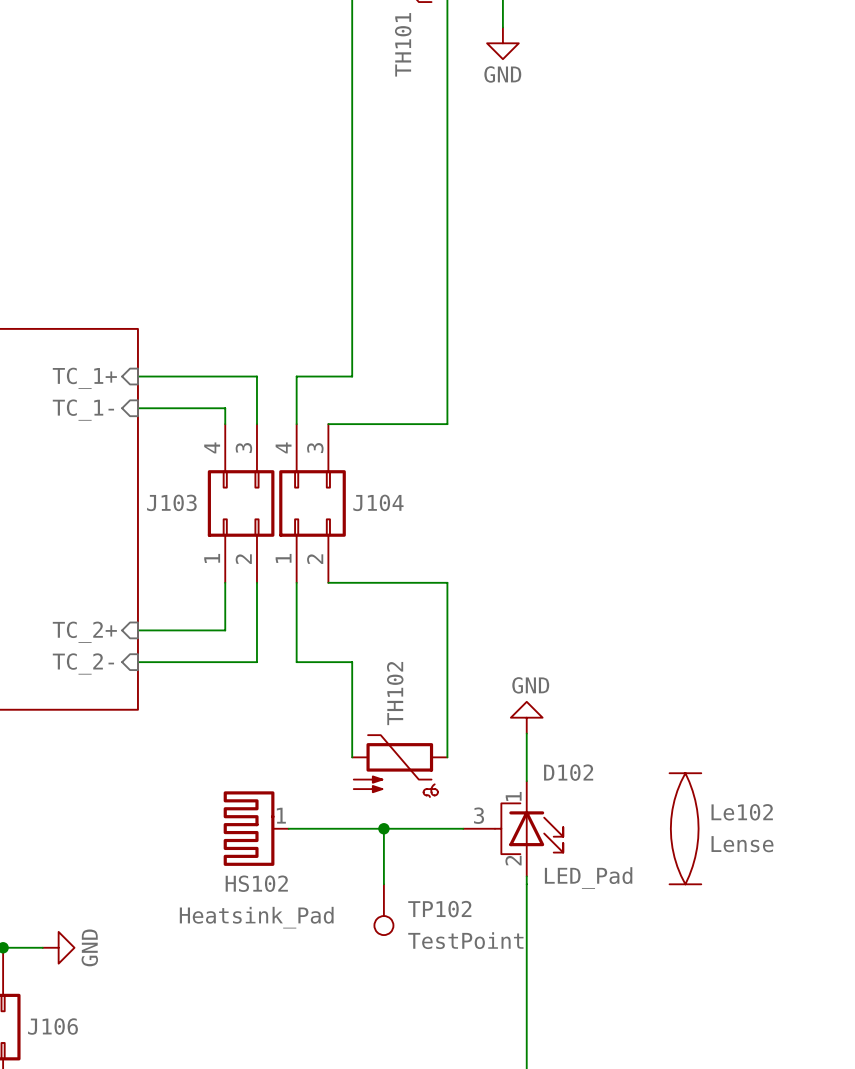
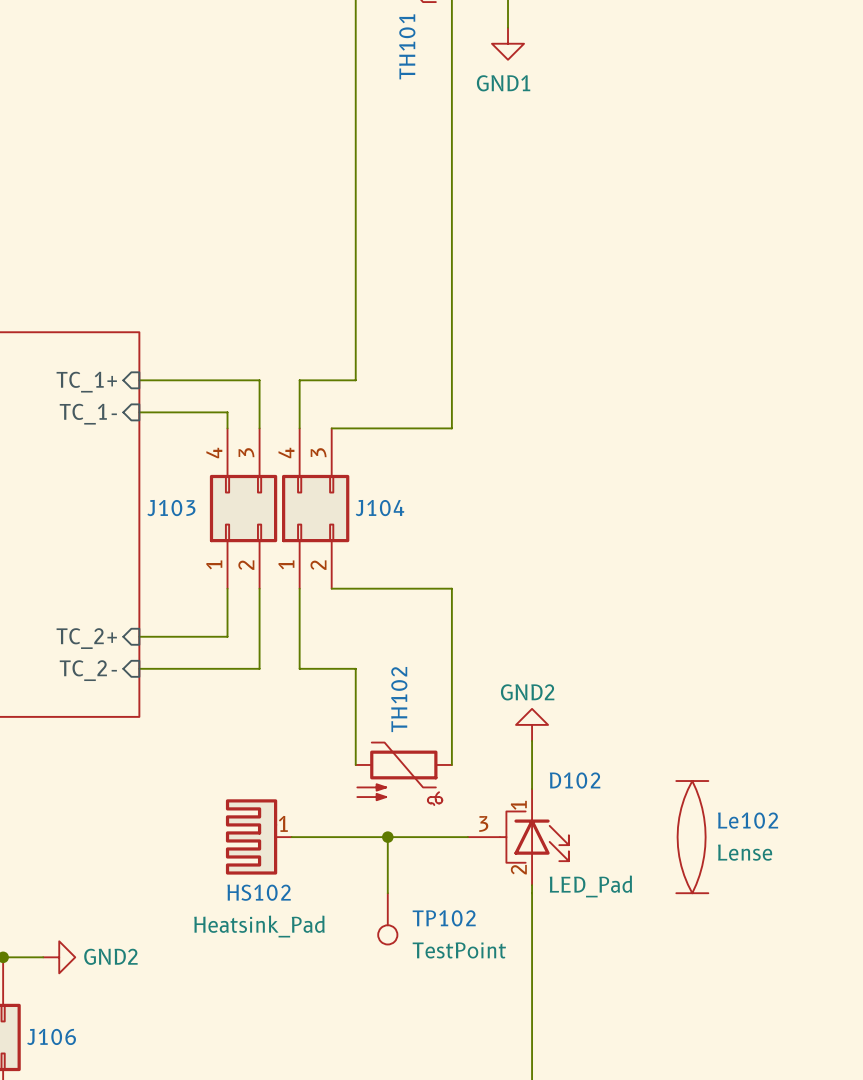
power symbol: GND (502, 43) -> GND1 (508, 43)
power symbol: GND (526, 717) -> GND2 (532, 724)
power symbol: GND (58, 947) -> GND2 (59, 957)

